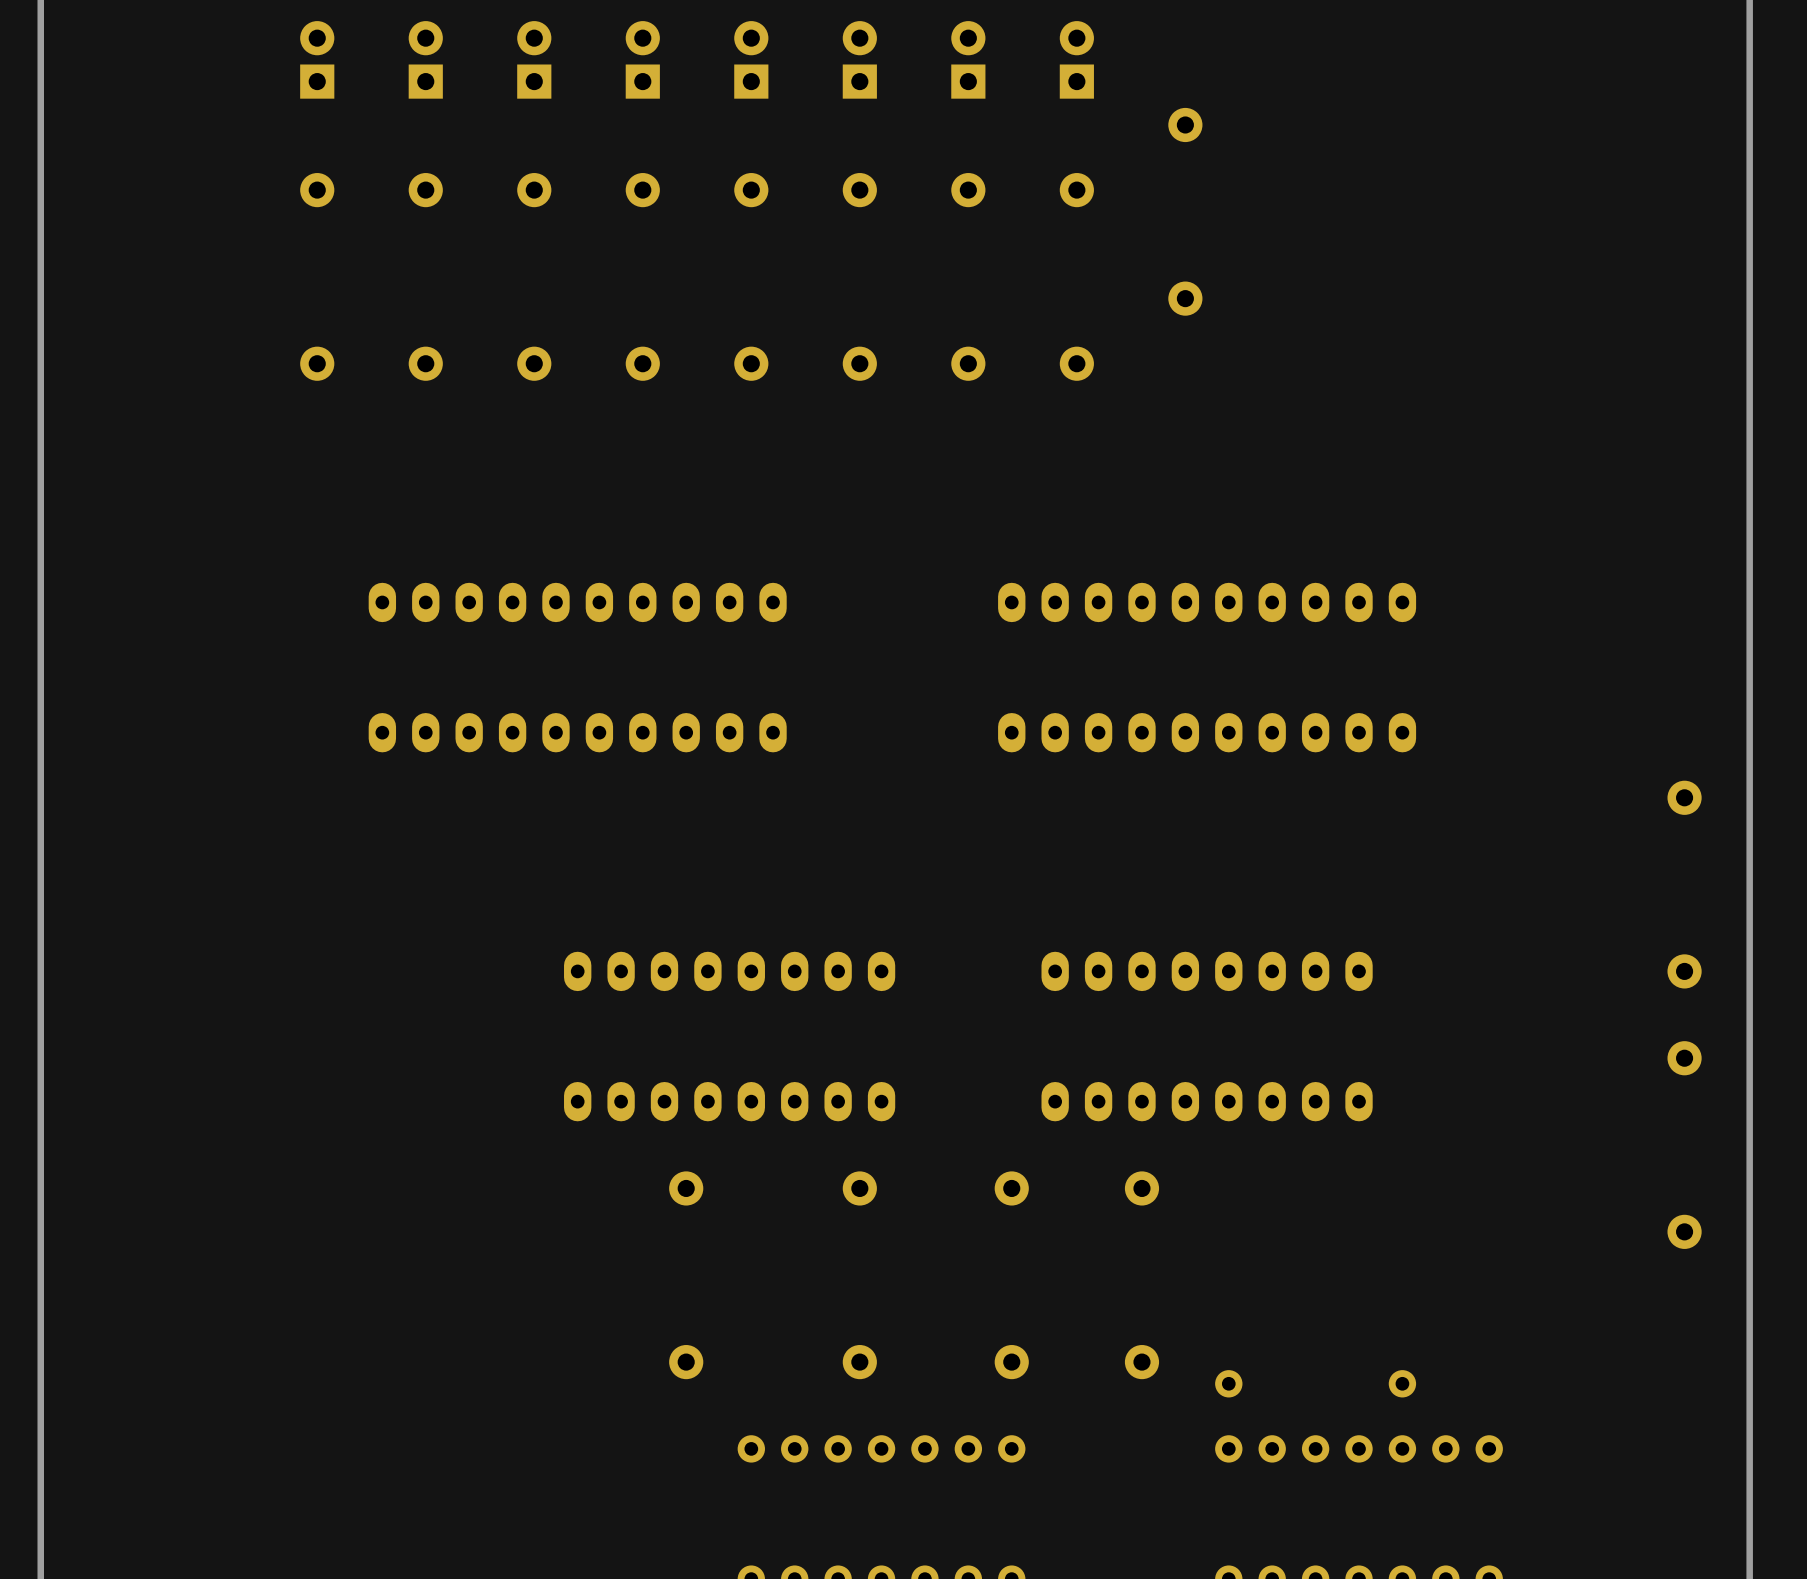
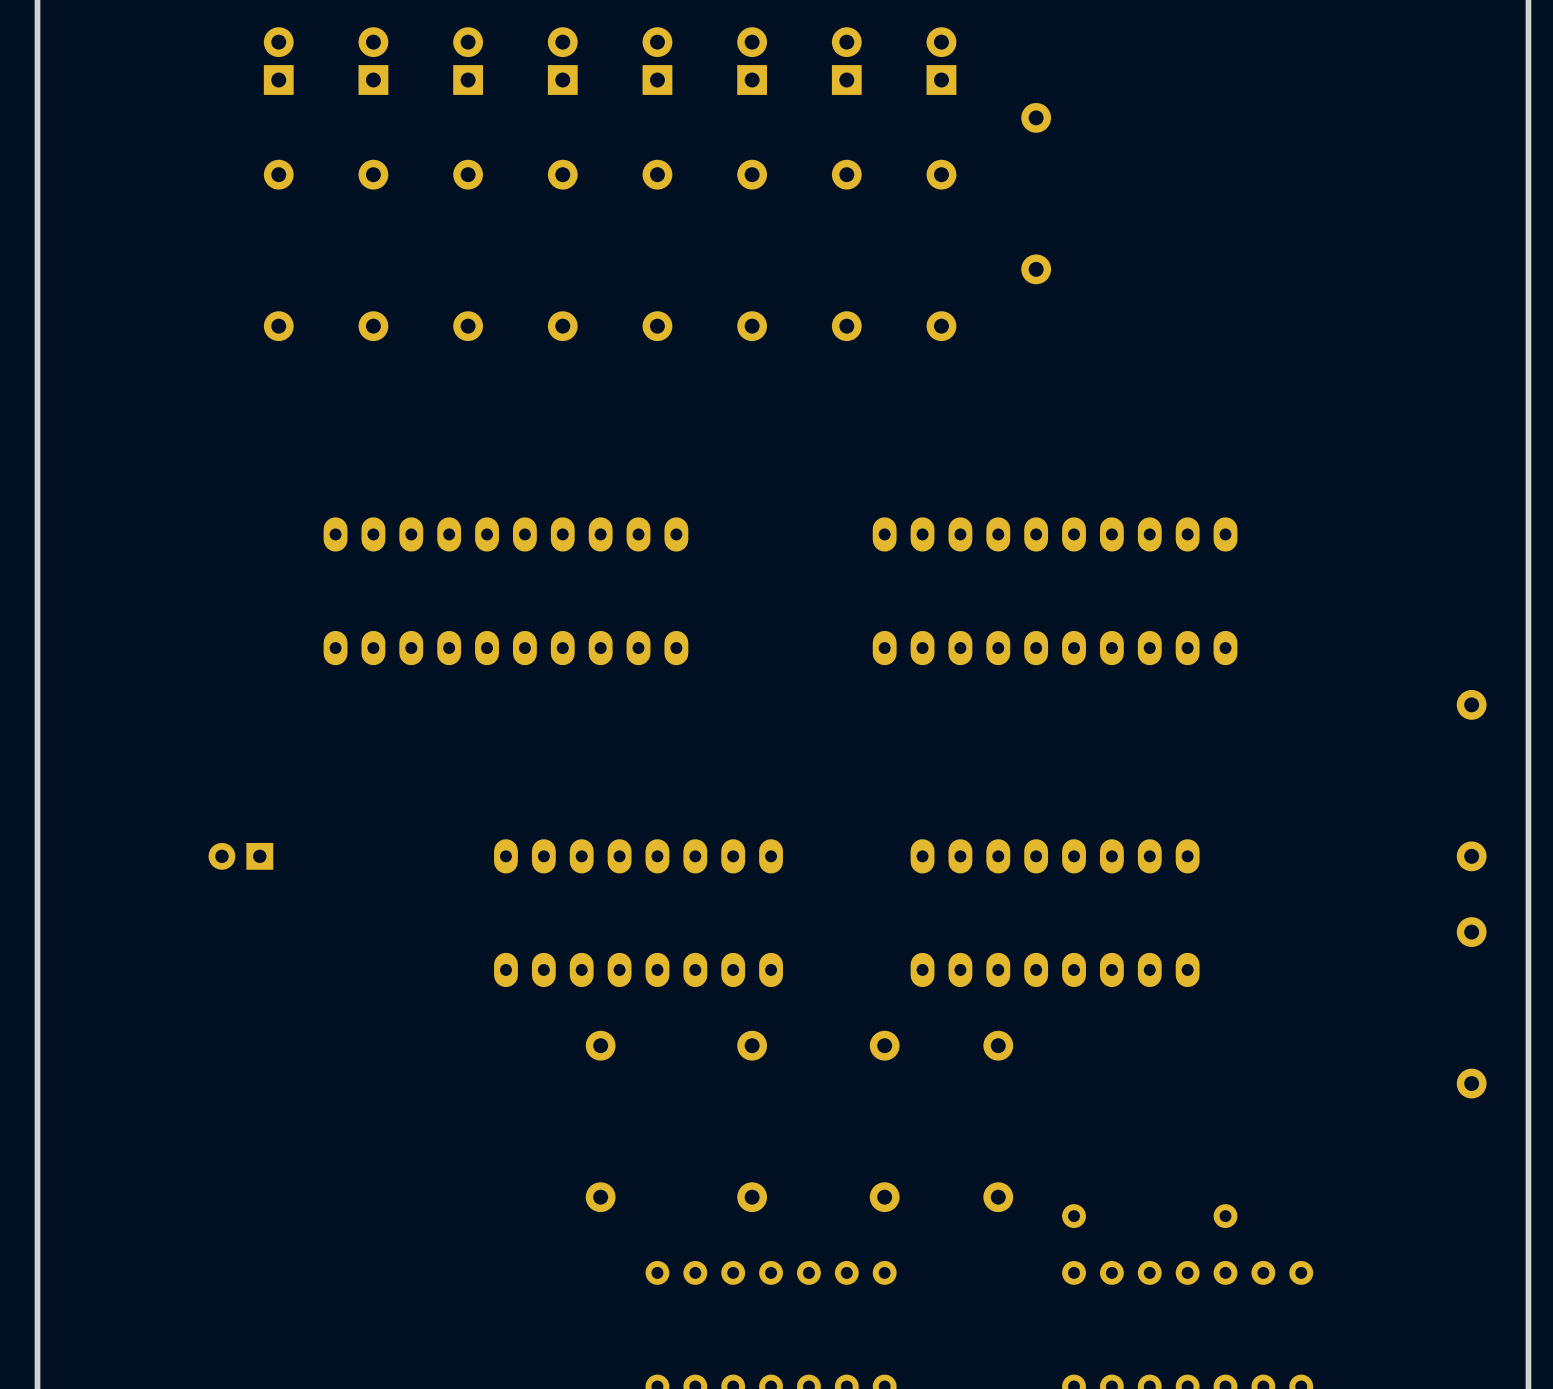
part: none -> (240, 856)

